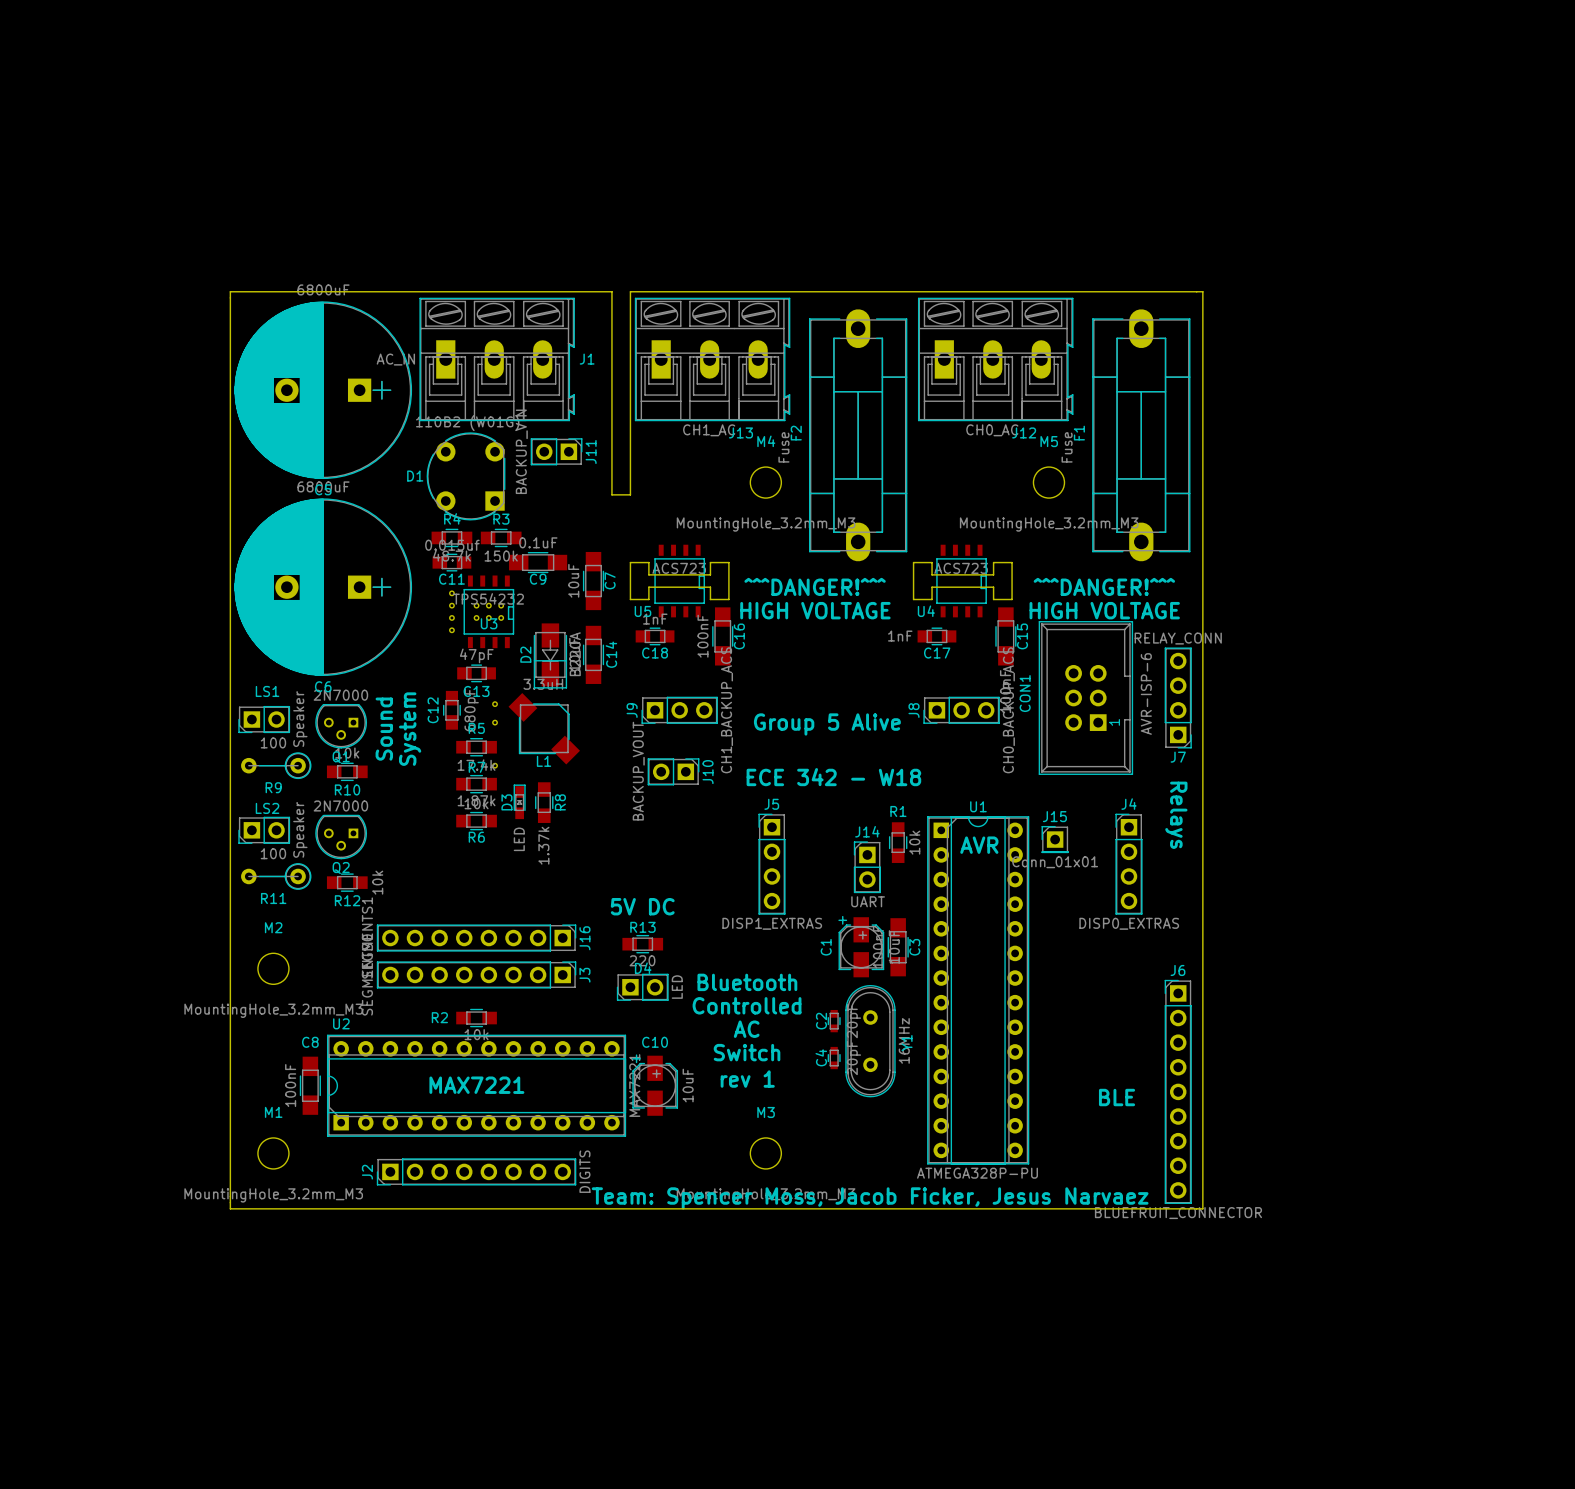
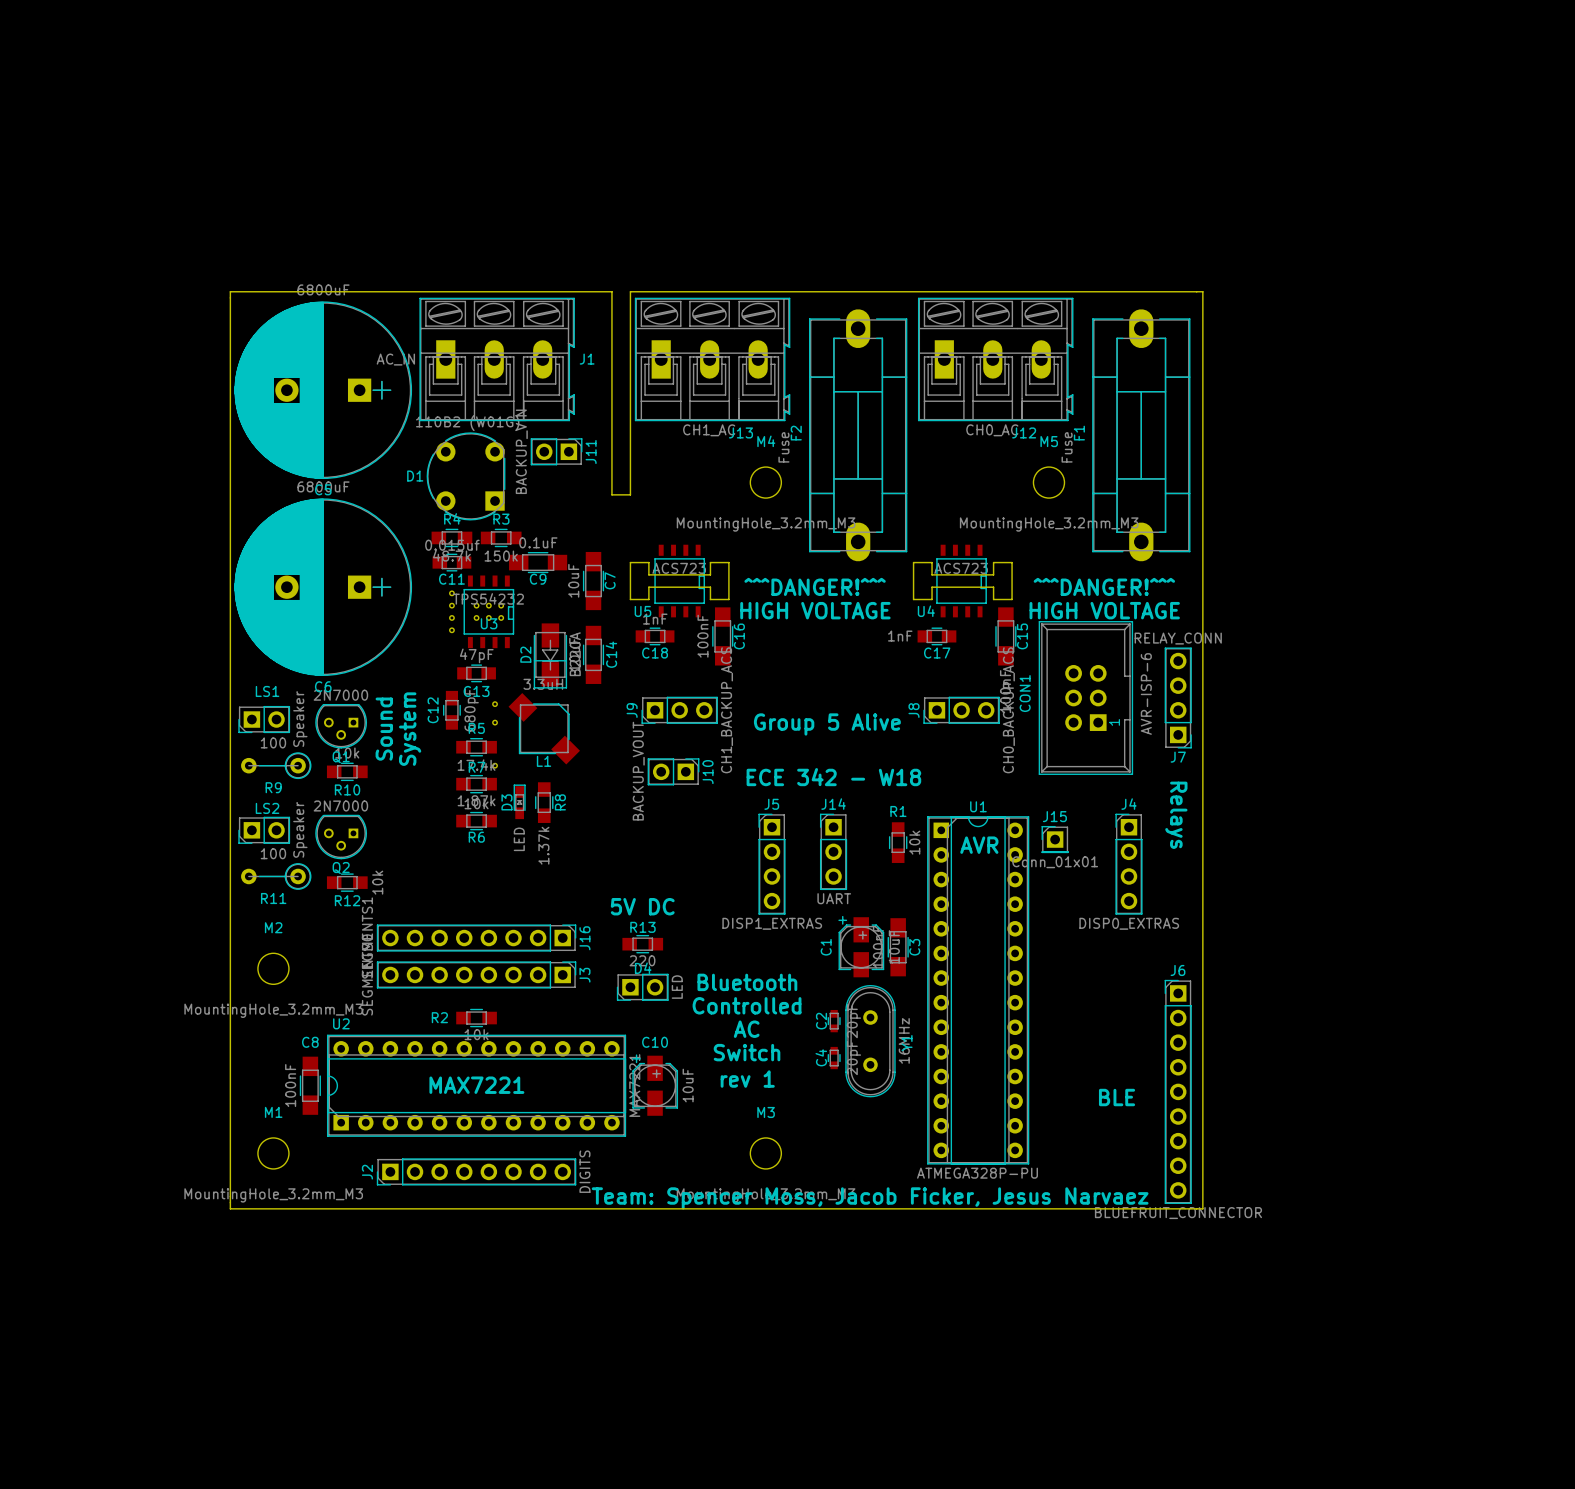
J14 footprint: [853, 841, 881, 894] -> [820, 813, 848, 890]

